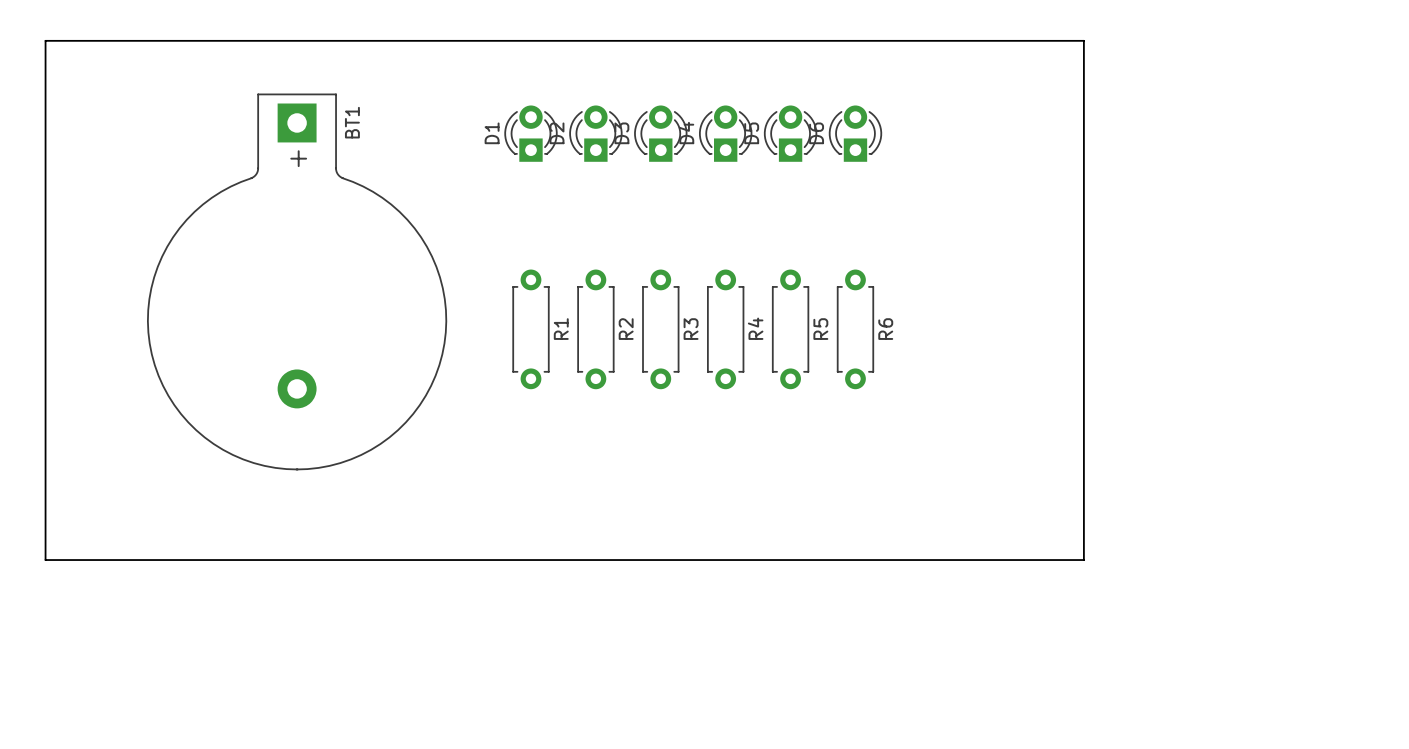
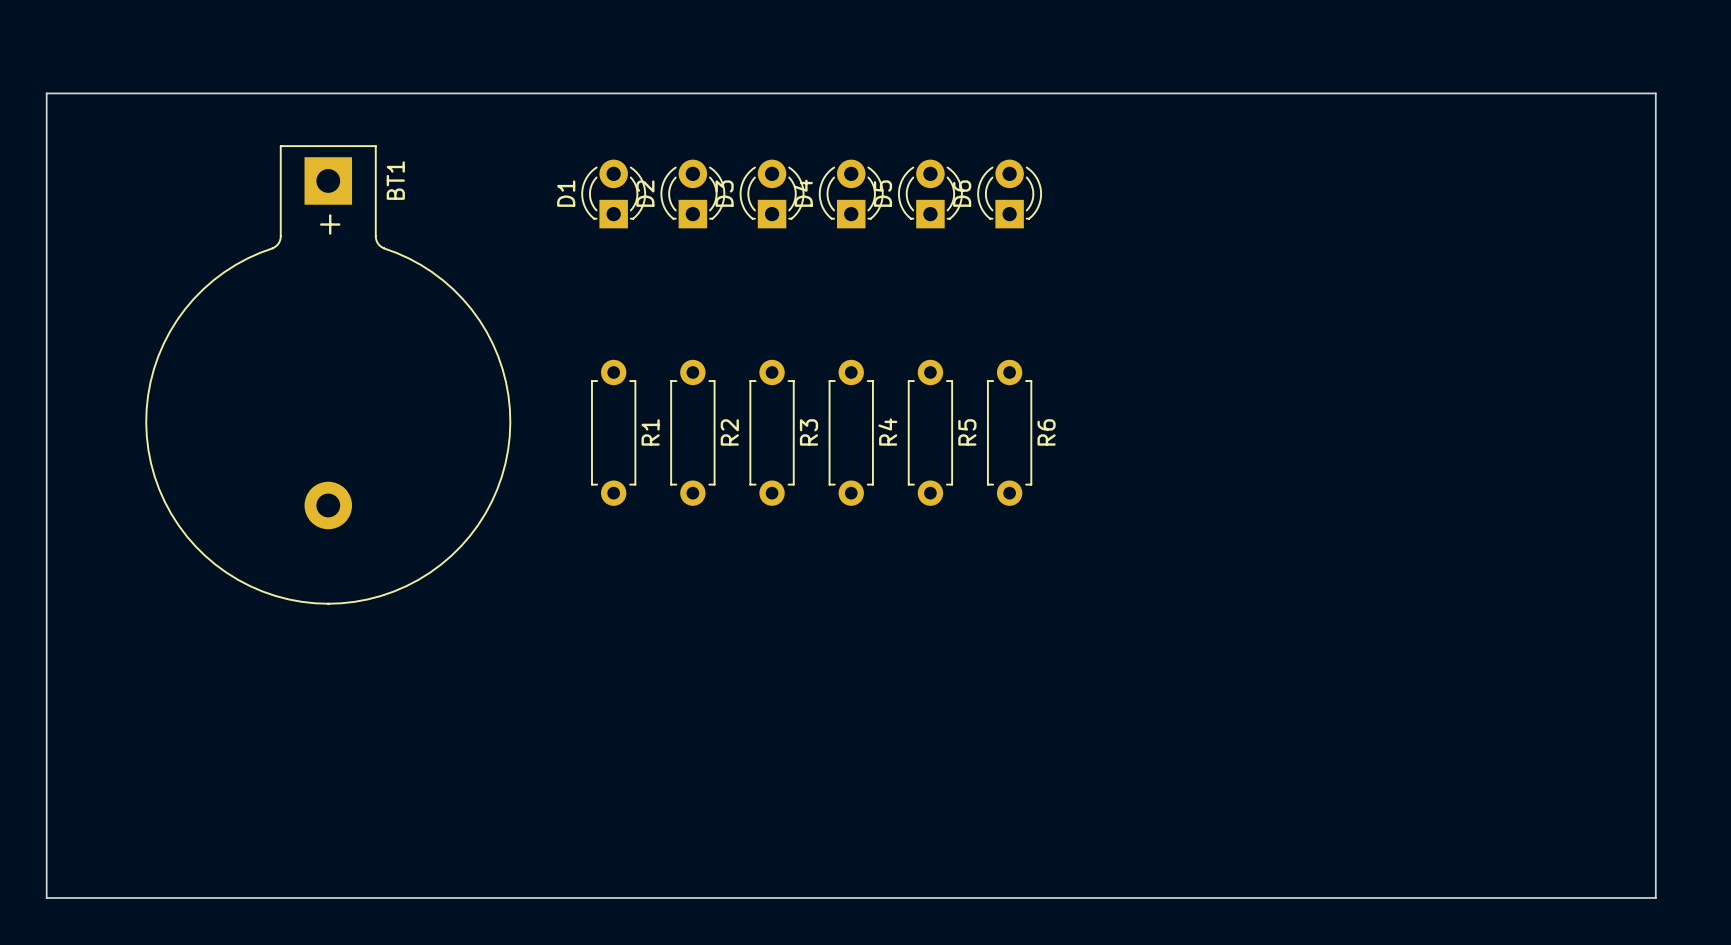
board edge: (45, 40) (1083, 40) (1083, 560) (45, 560) (45, 40) -> (46, 93) (46, 897) (1655, 897) (1655, 93) (46, 93)

